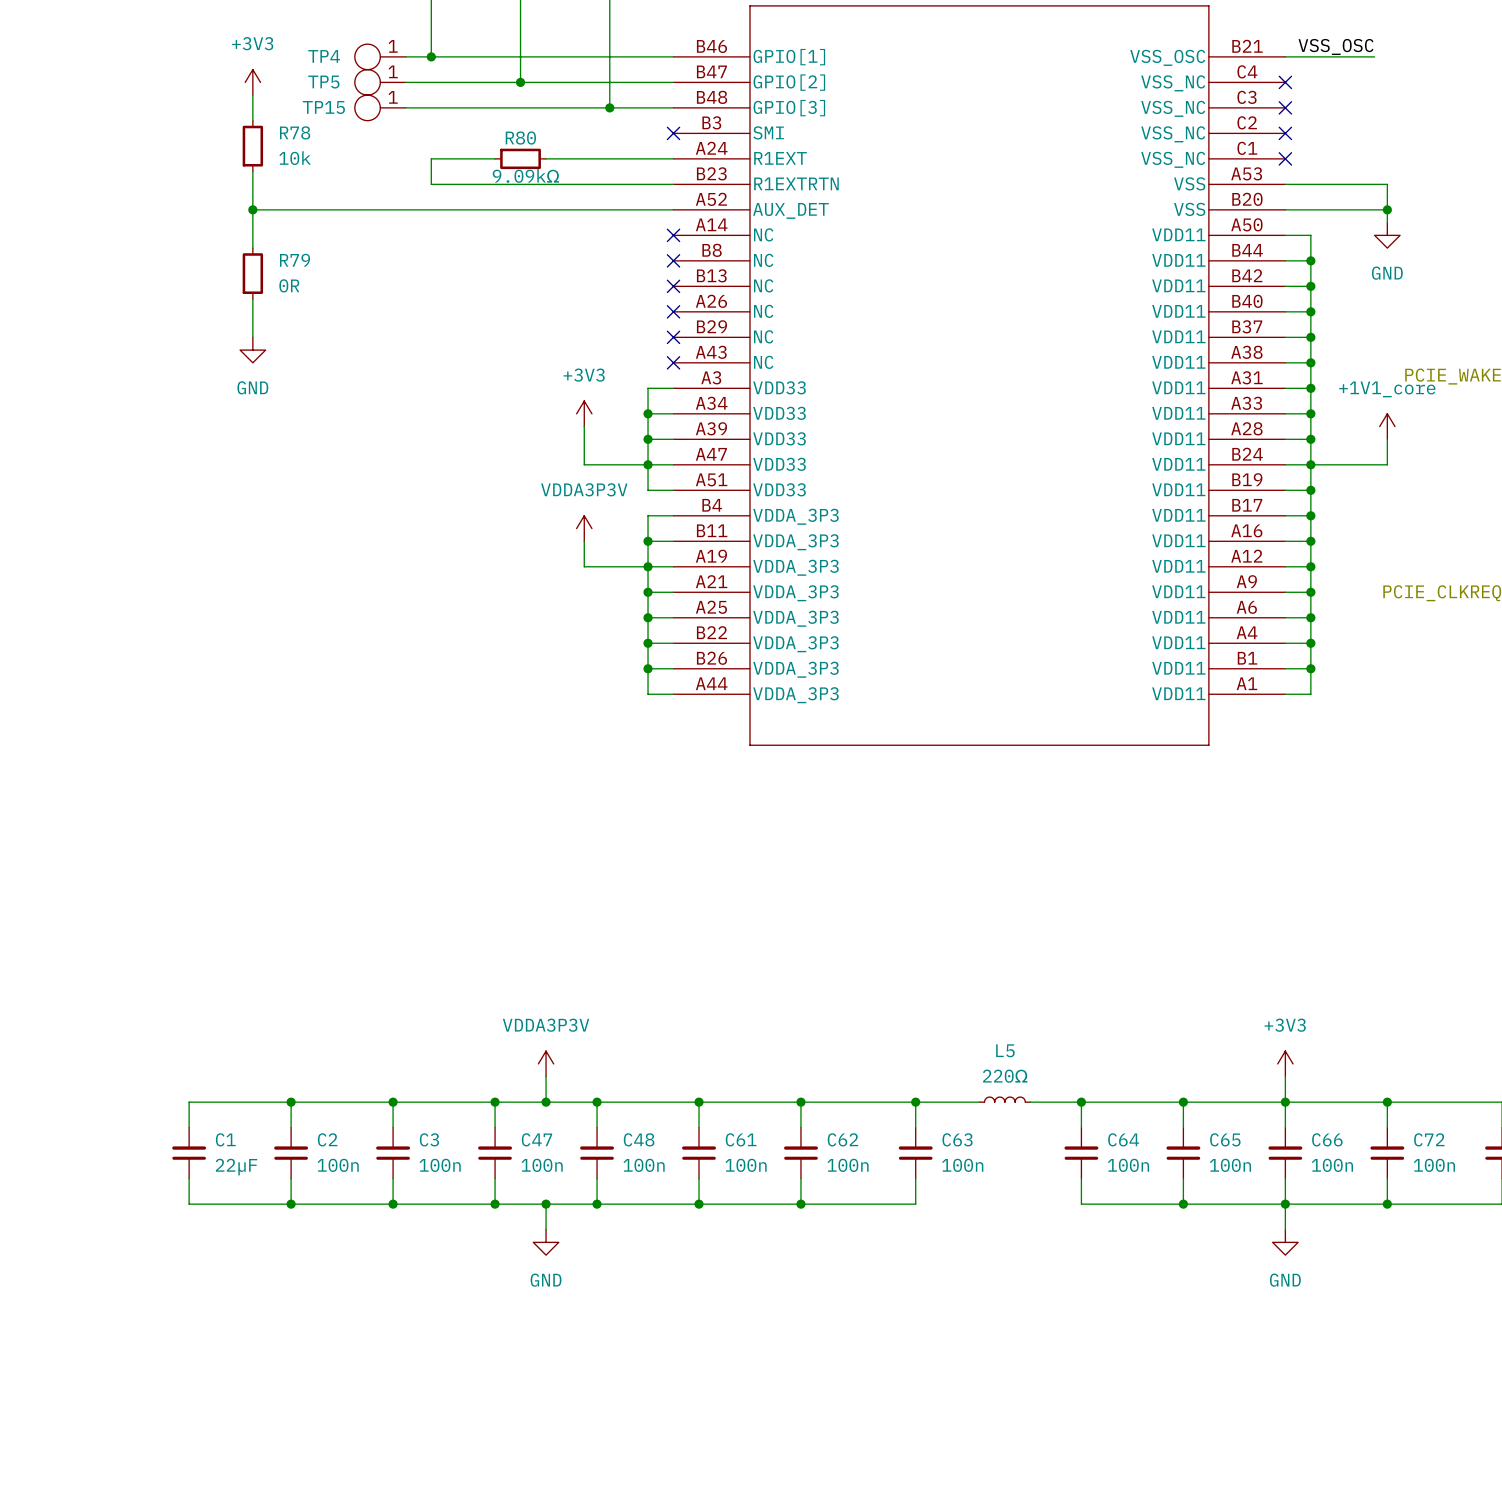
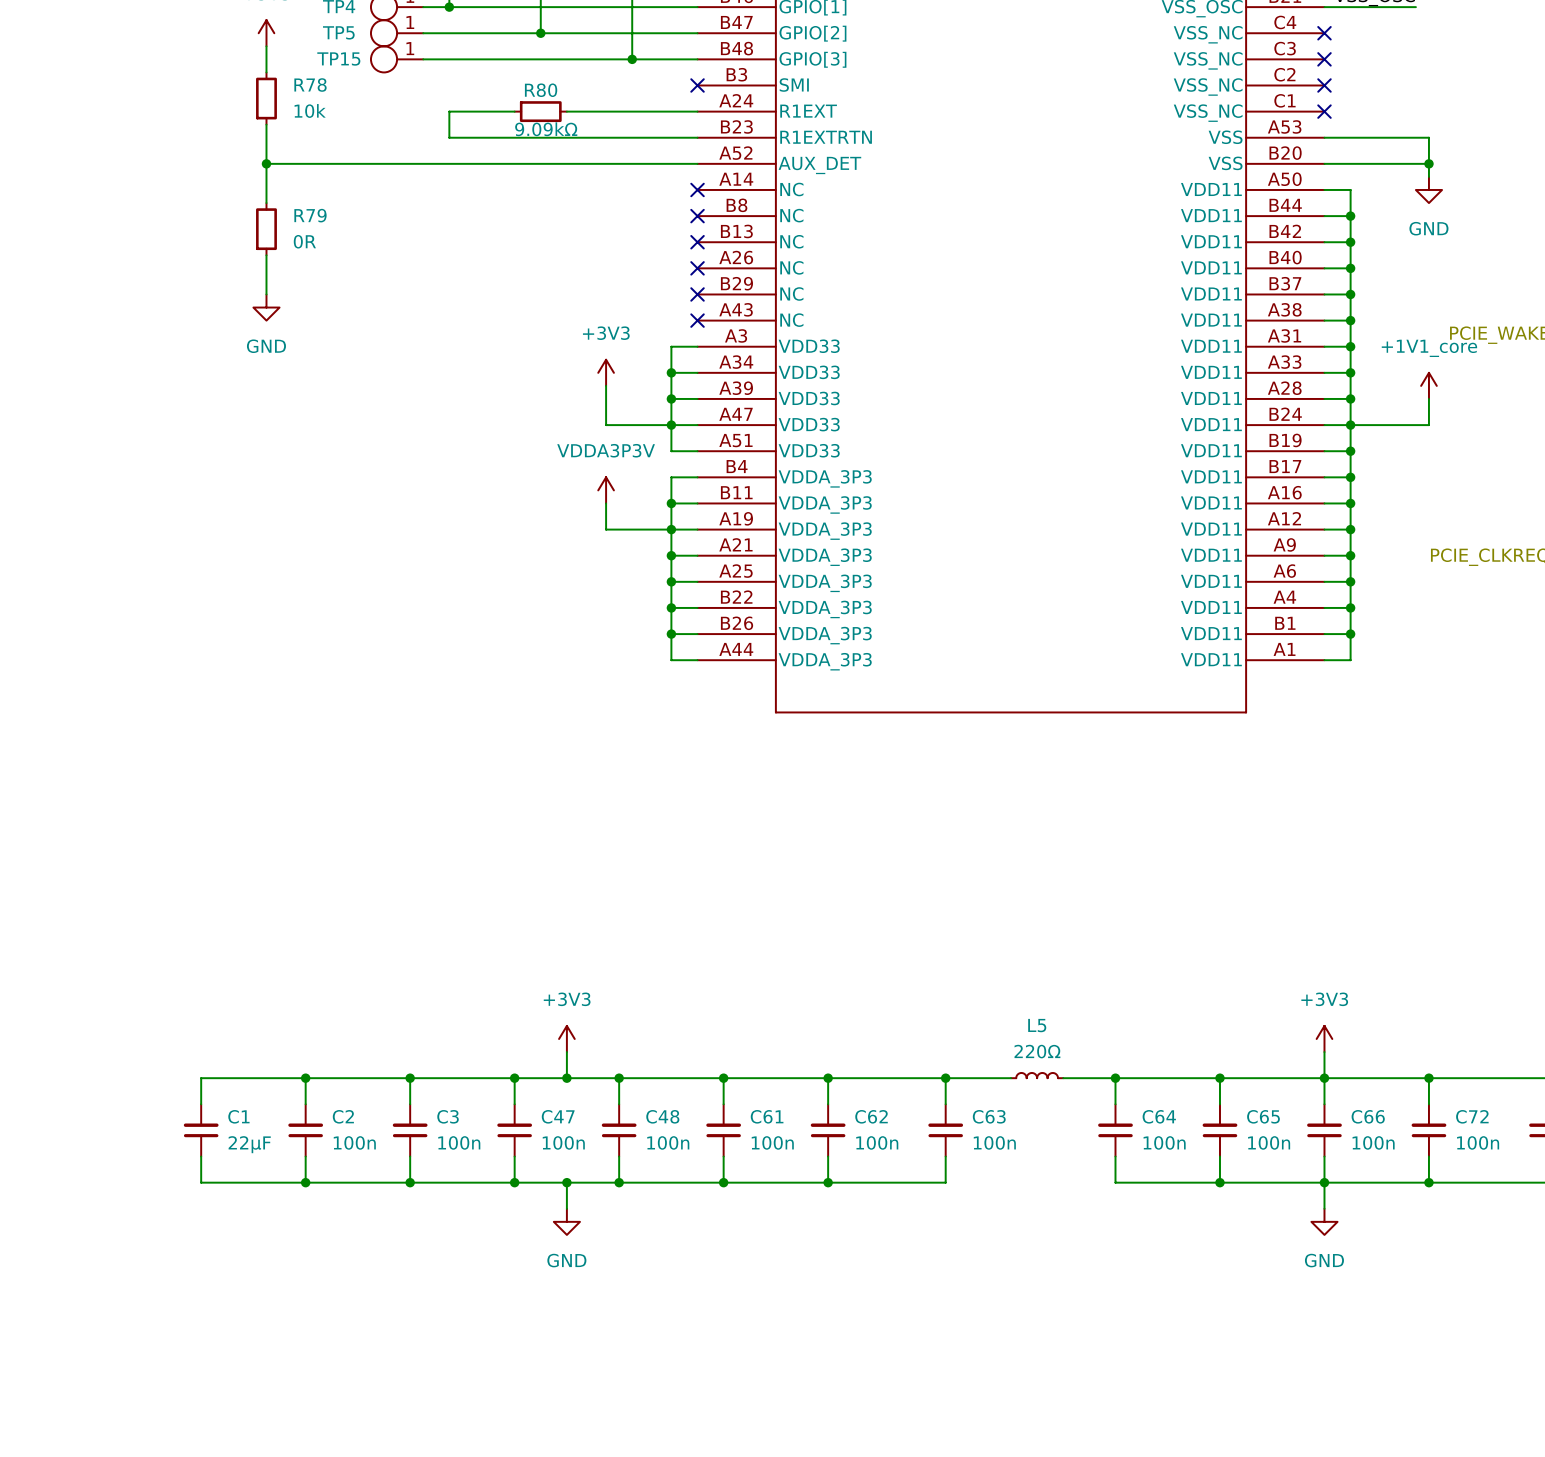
power symbol: VDDA3P3V (546, 1063) -> +3V3 (566, 1038)

